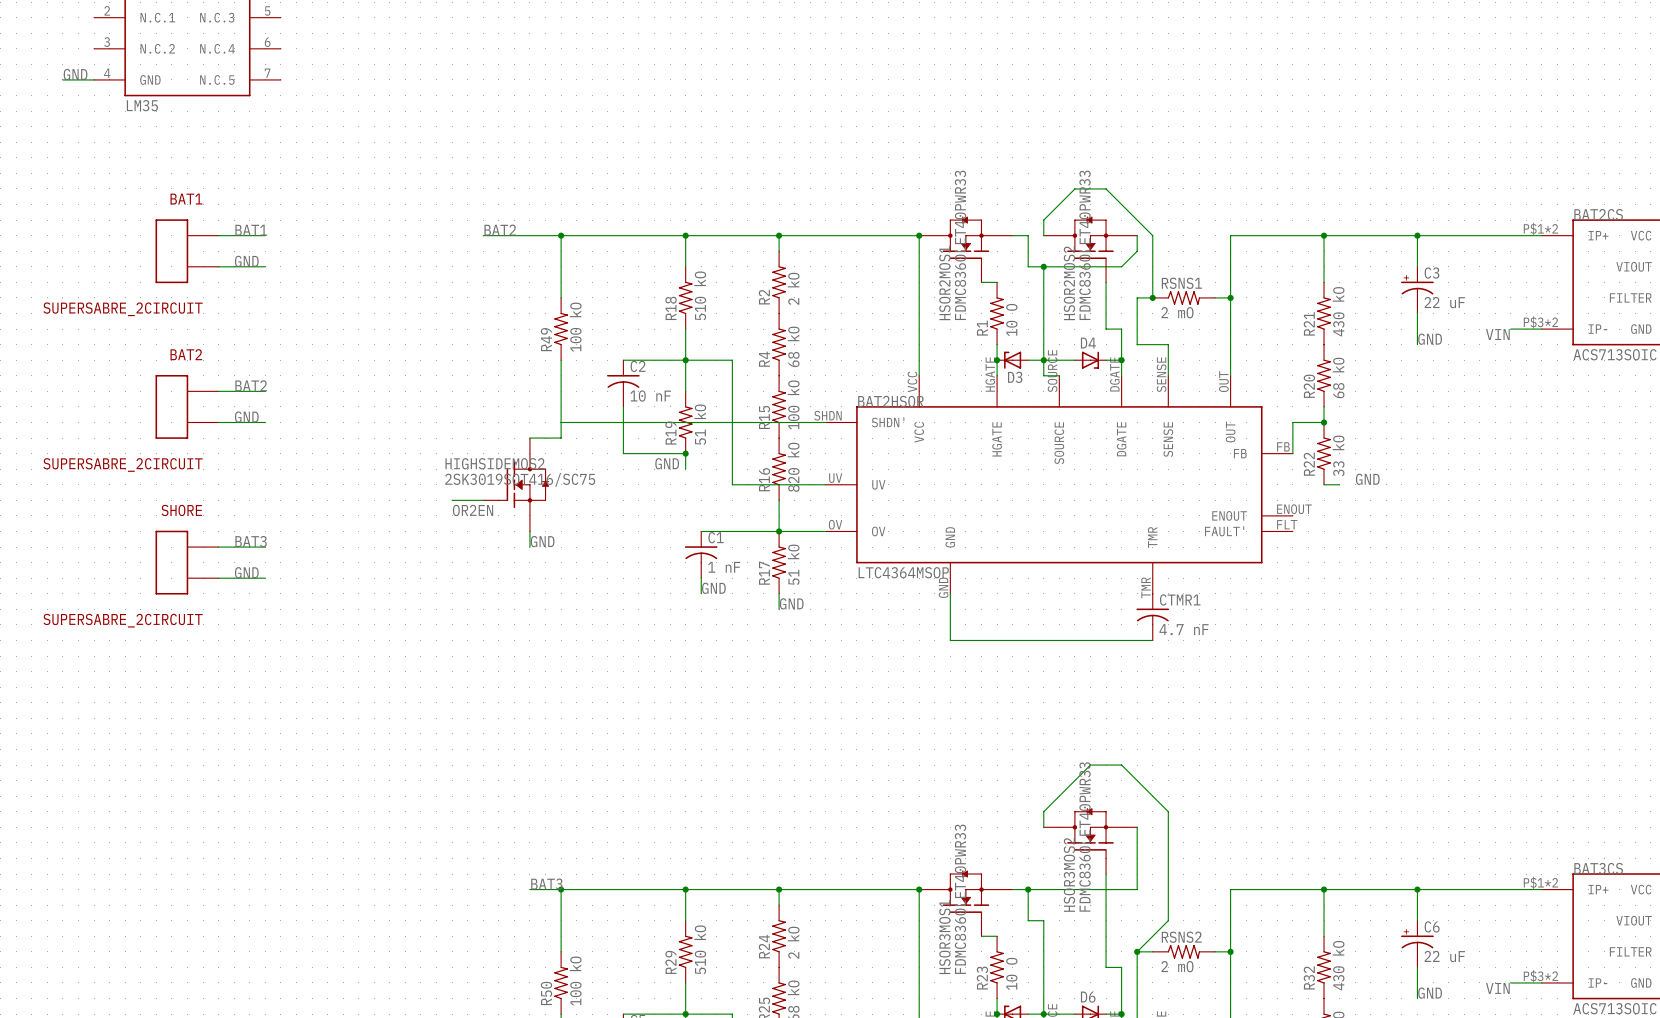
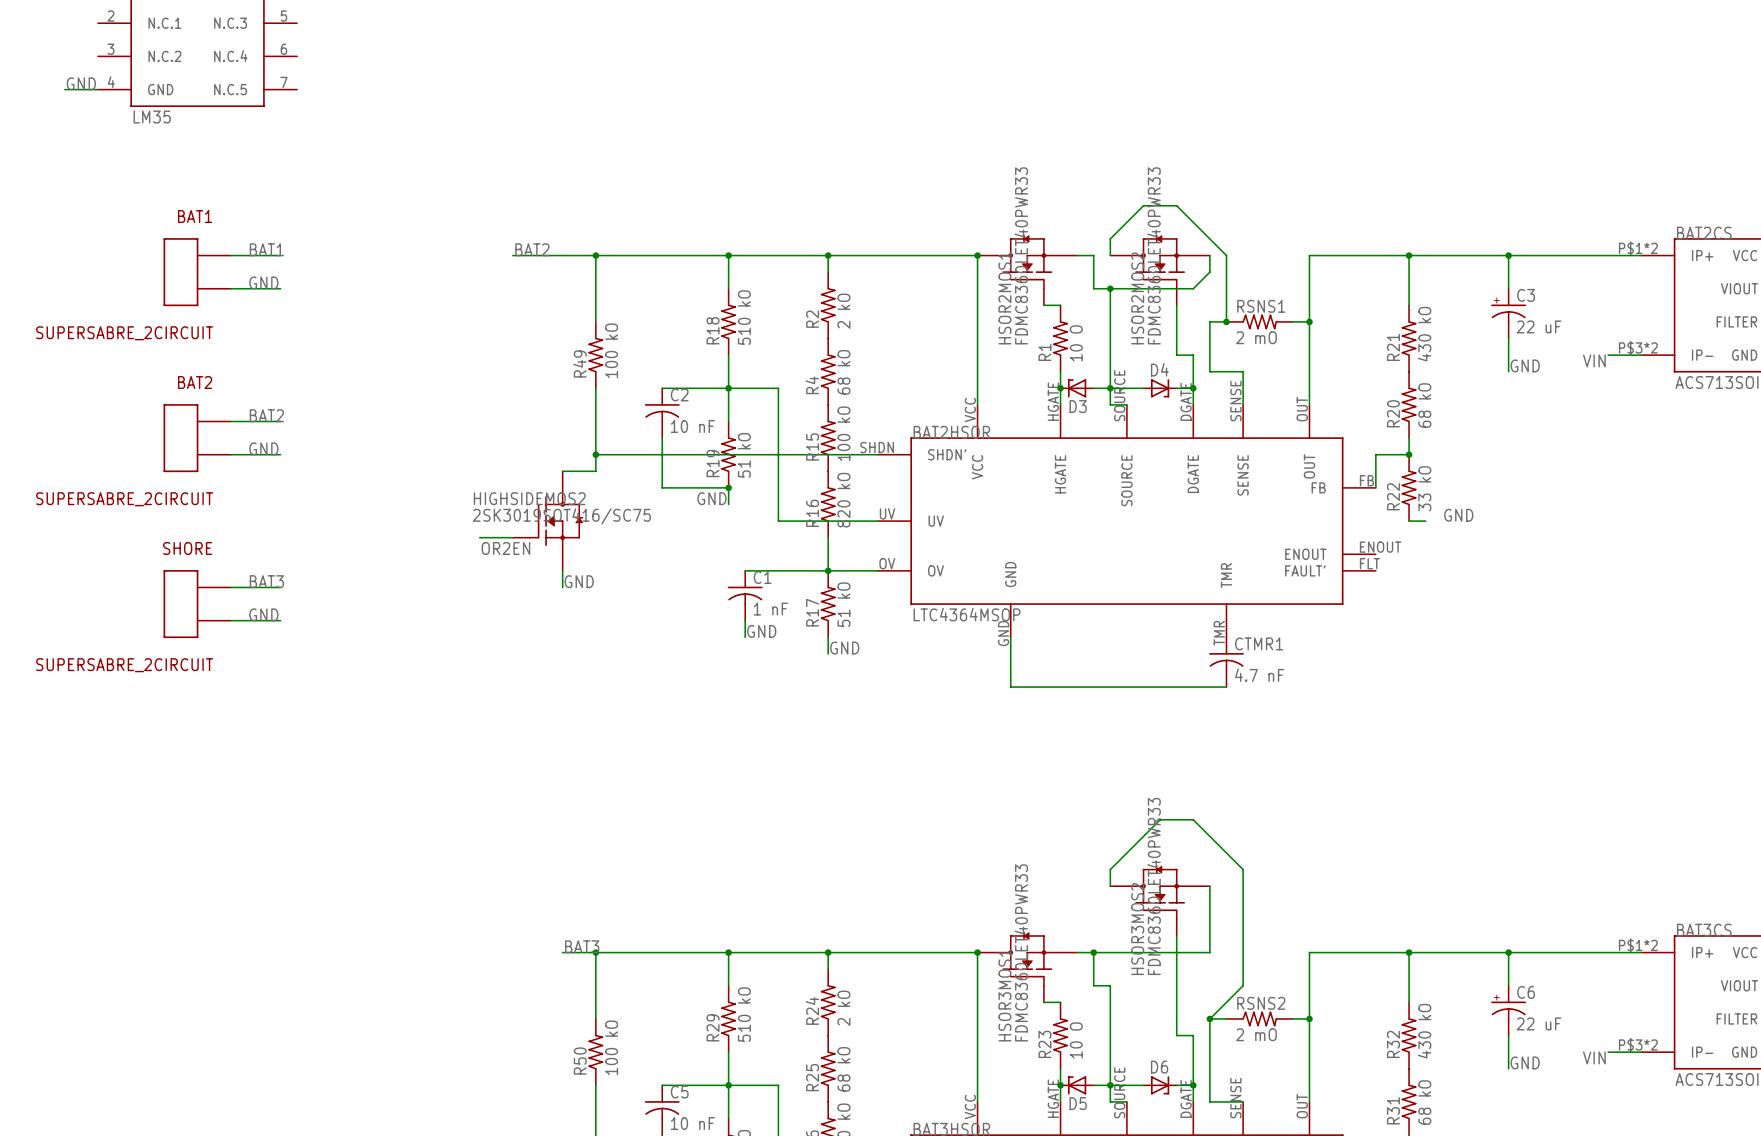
junction: none -> (595, 454)

